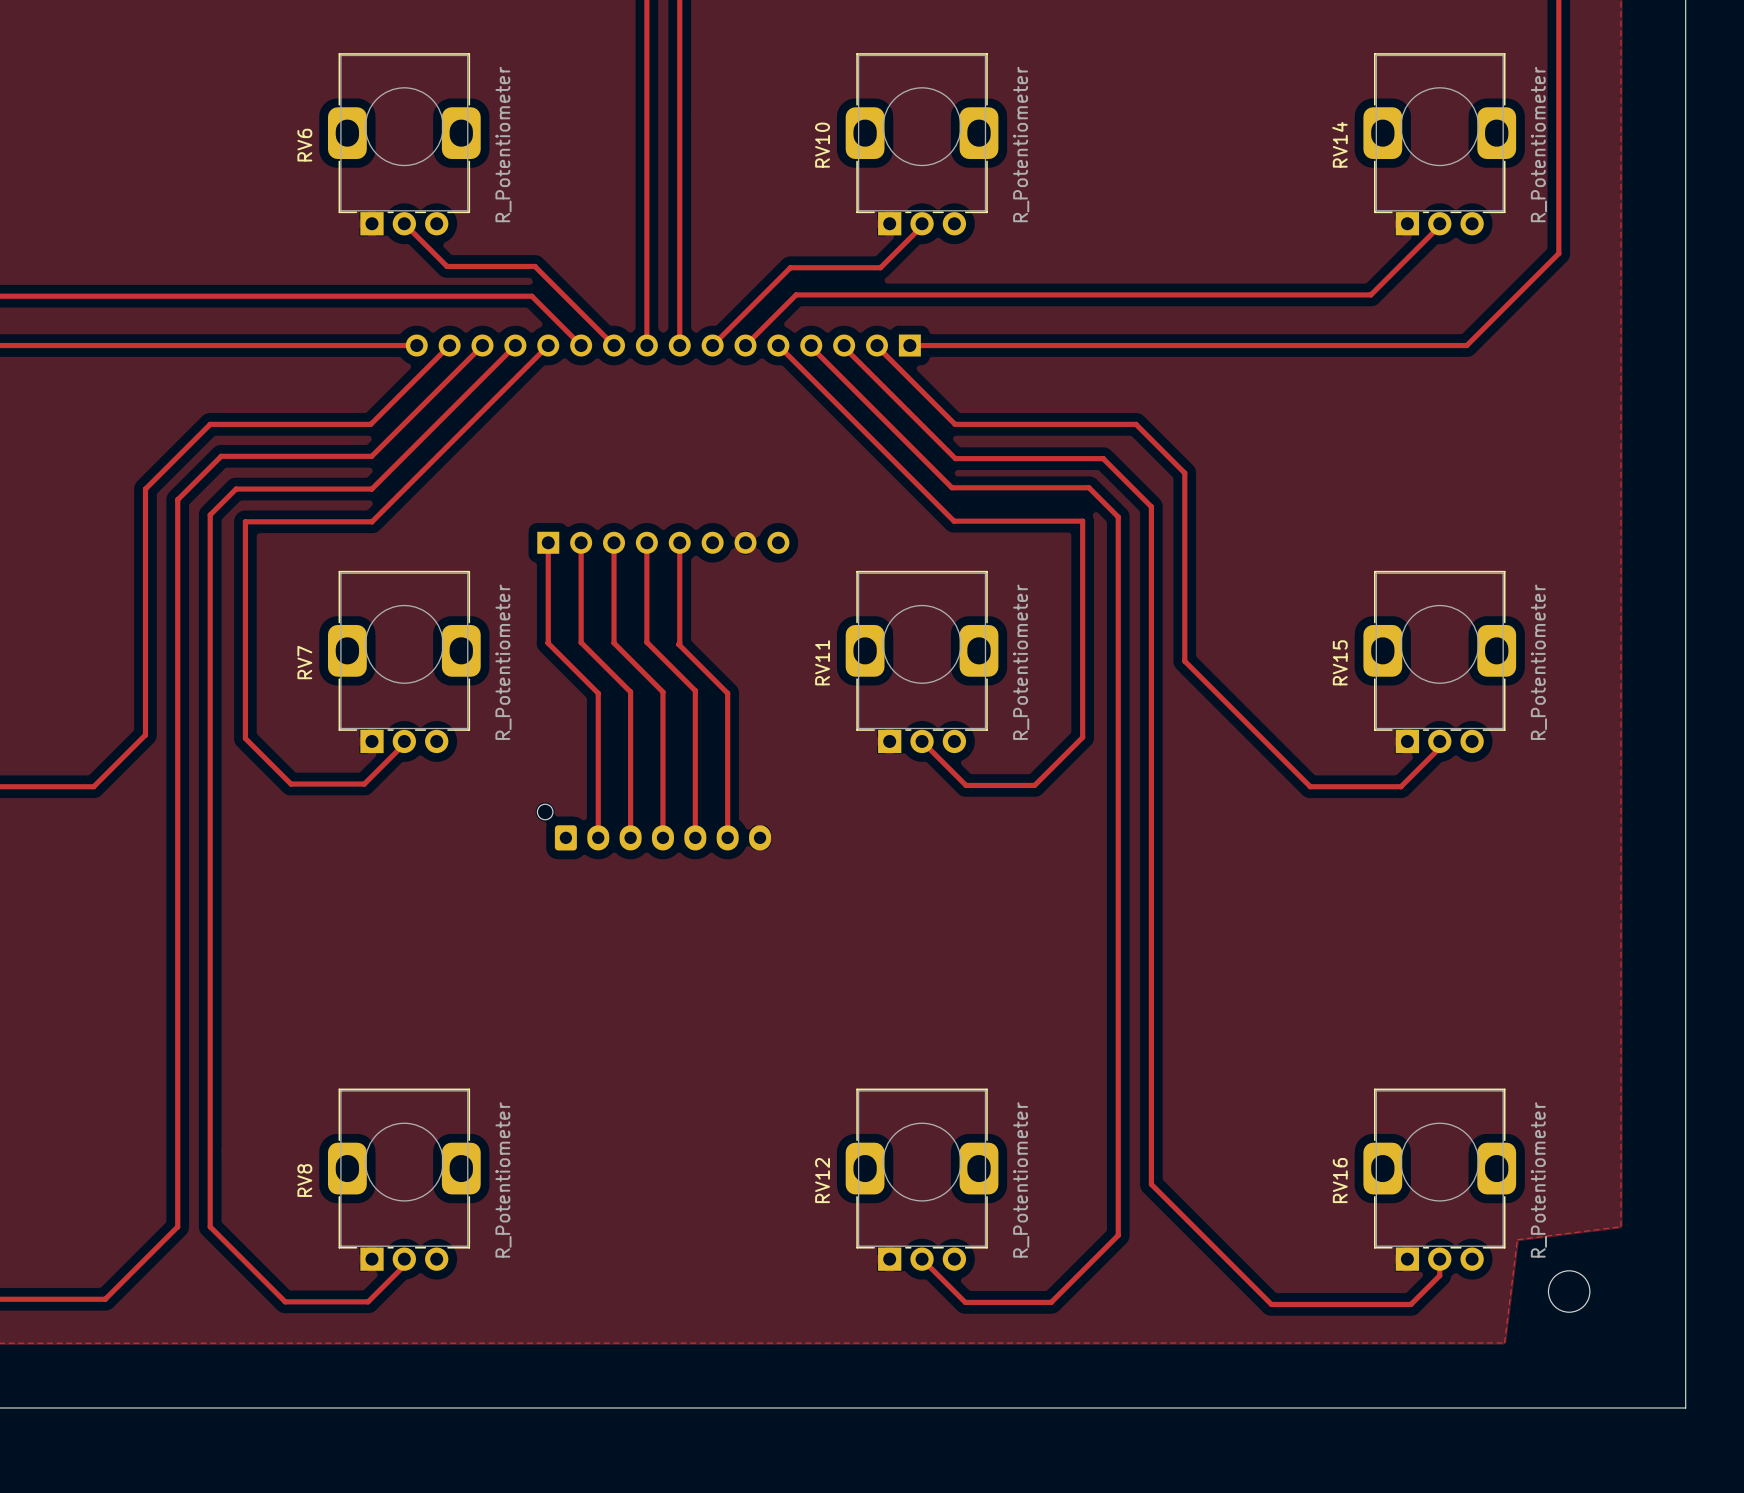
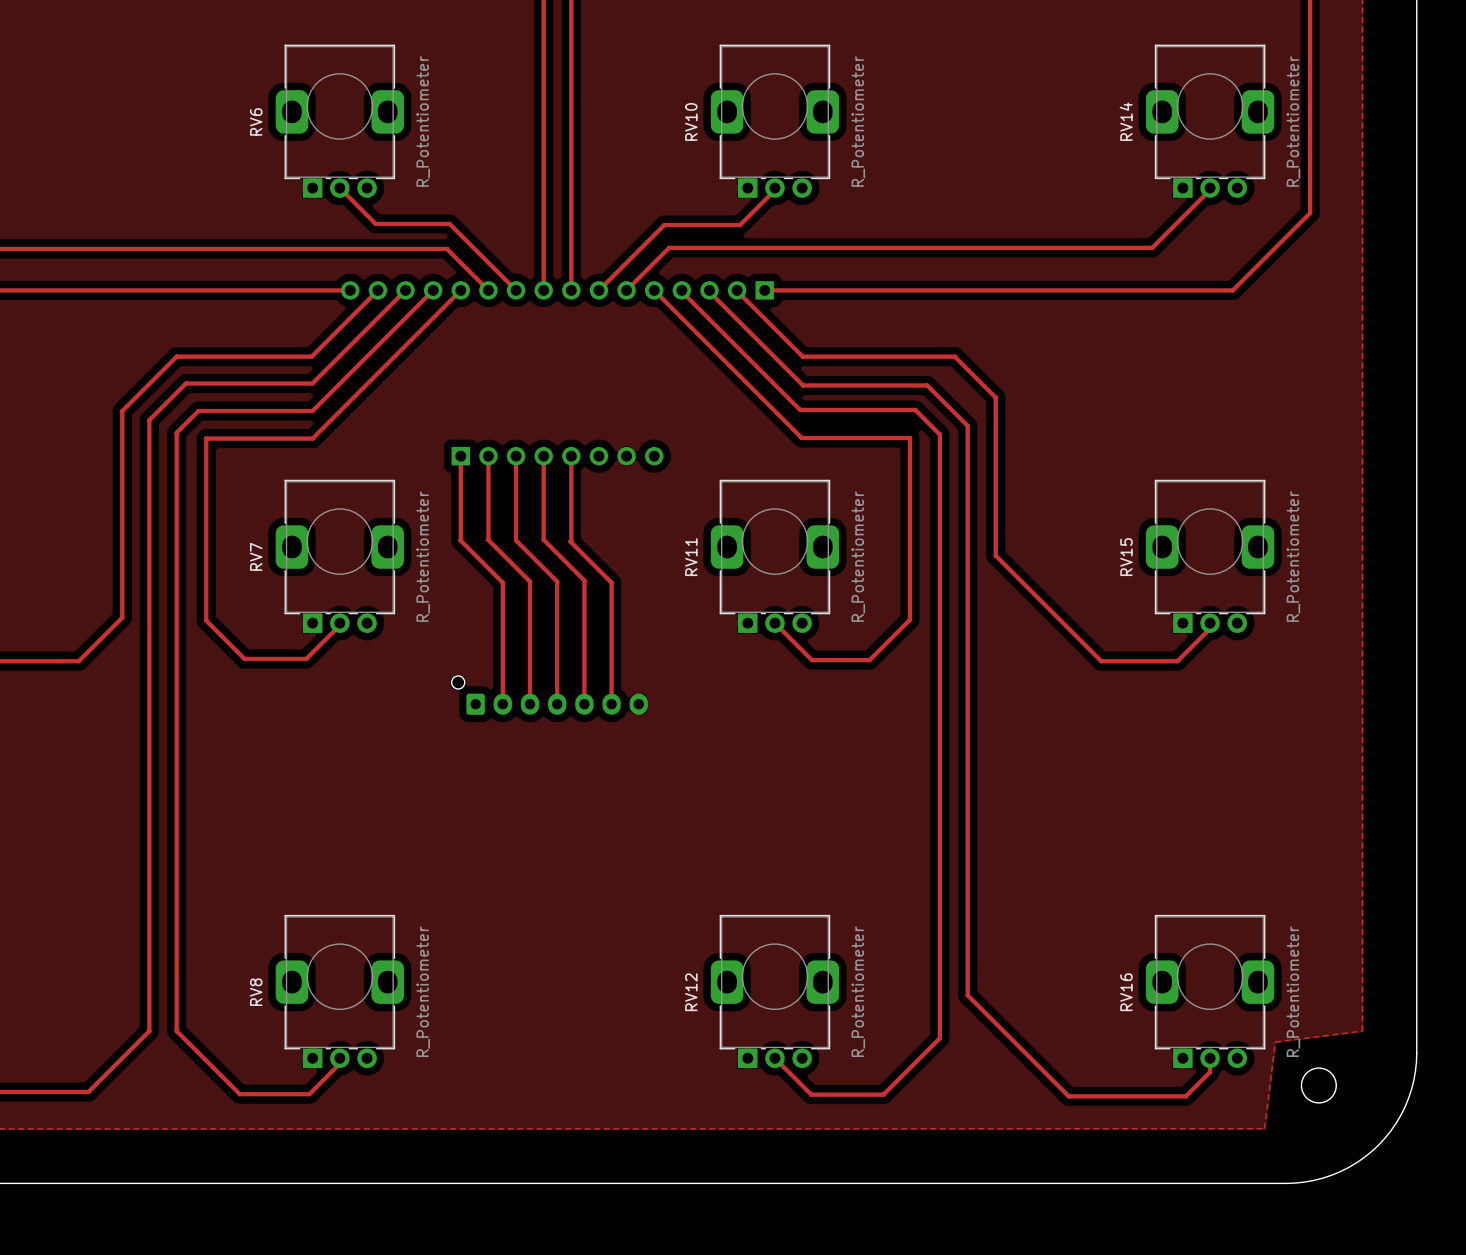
board edge: (1685, 1252) (1685, 1408) (1530, 1408) -> (1416, 1052) (1415, 1071) (1408, 1098) (1396, 1123) (1378, 1145) (1356, 1162) (1331, 1175) (1304, 1182) (1286, 1183)

